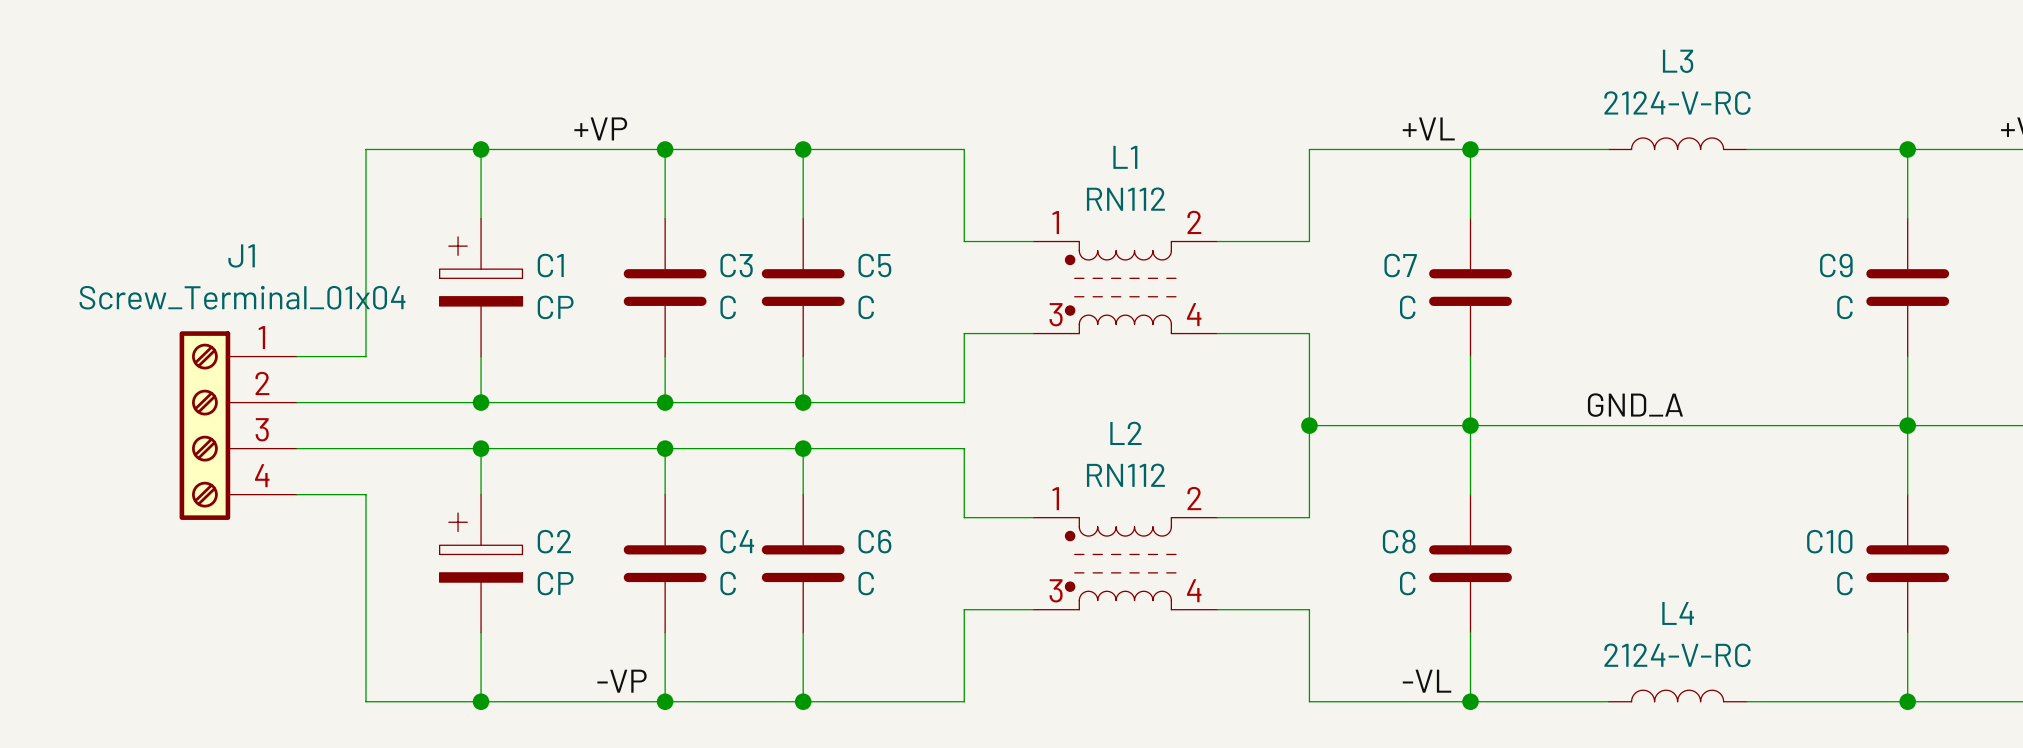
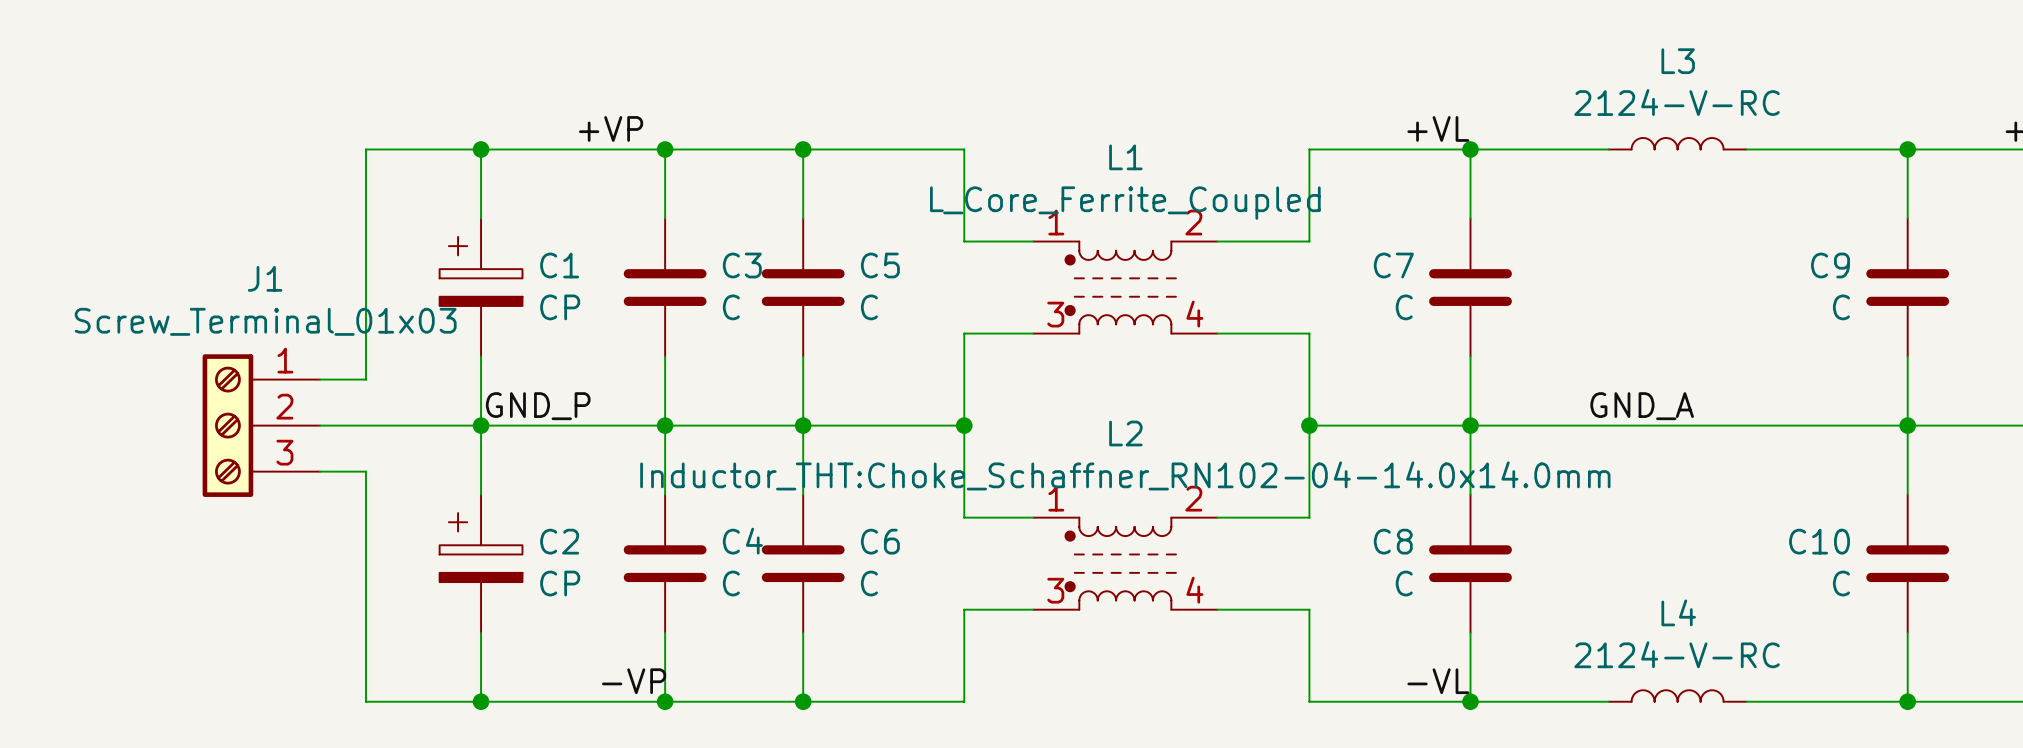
L1 value: RN112 (1125, 199) -> L_Core_Ferrite_Coupled (1125, 203)
J1 value: Screw_Terminal_01x04 (242, 297) -> Screw_Terminal_01x03 (265, 321)
J1 symbol: [179, 331, 297, 520] -> [202, 354, 320, 497]
wire: (296, 356) (365, 356) -> (319, 379) (365, 379) (365, 356)
wire: (296, 402) (964, 402) -> (964, 448) (964, 402)
wire: none -> (481, 402) (481, 448)
junction: (481, 402) -> none
wire: none -> (665, 402) (665, 448)
junction: (665, 402) -> none
wire: none -> (803, 402) (803, 448)
junction: (803, 402) -> none
label: none -> GND_P (538, 406)
wire: none -> (319, 425) (964, 425)
junction: none -> (481, 425)
junction: none -> (665, 425)
junction: none -> (803, 425)
junction: none -> (964, 425)
wire: (296, 448) (964, 448) -> none
junction: (481, 448) -> none
junction: (665, 448) -> none
junction: (803, 448) -> none
L2 value: RN112 (1125, 475) -> Inductor_THT:Choke_Schaffner_RN102-04-14.0x14.0mm (1125, 475)
wire: (296, 494) (365, 494) -> (319, 471) (365, 471) (365, 494)

